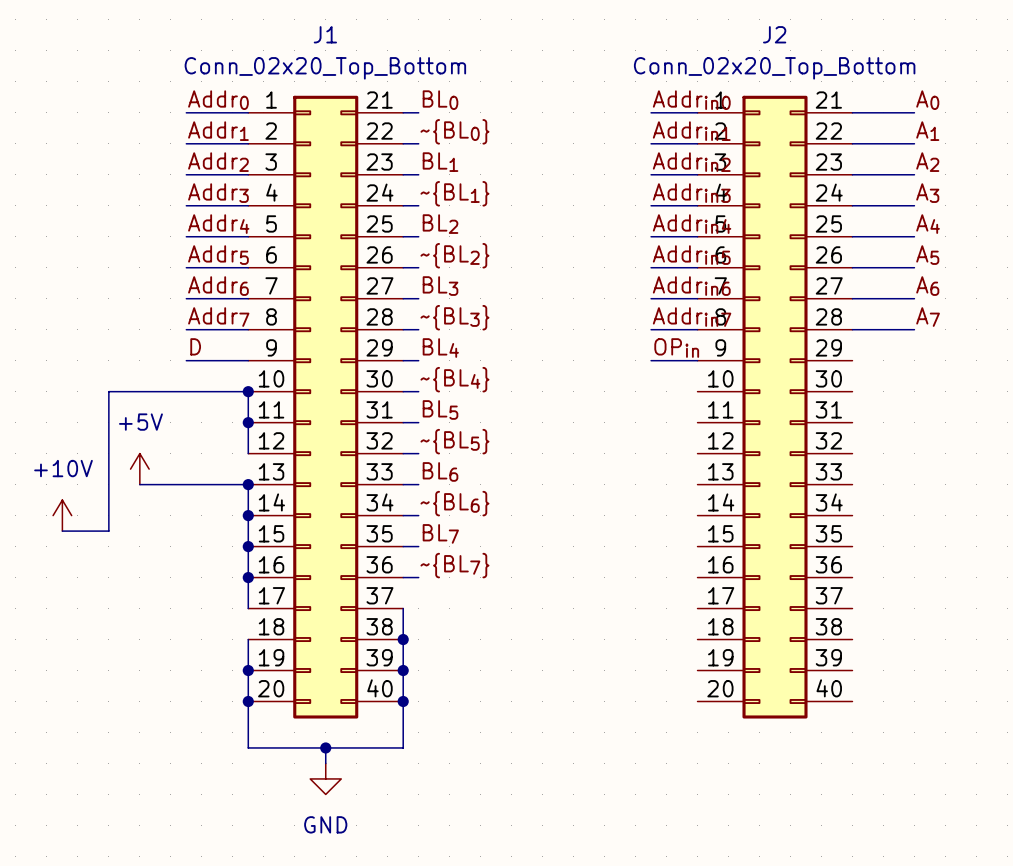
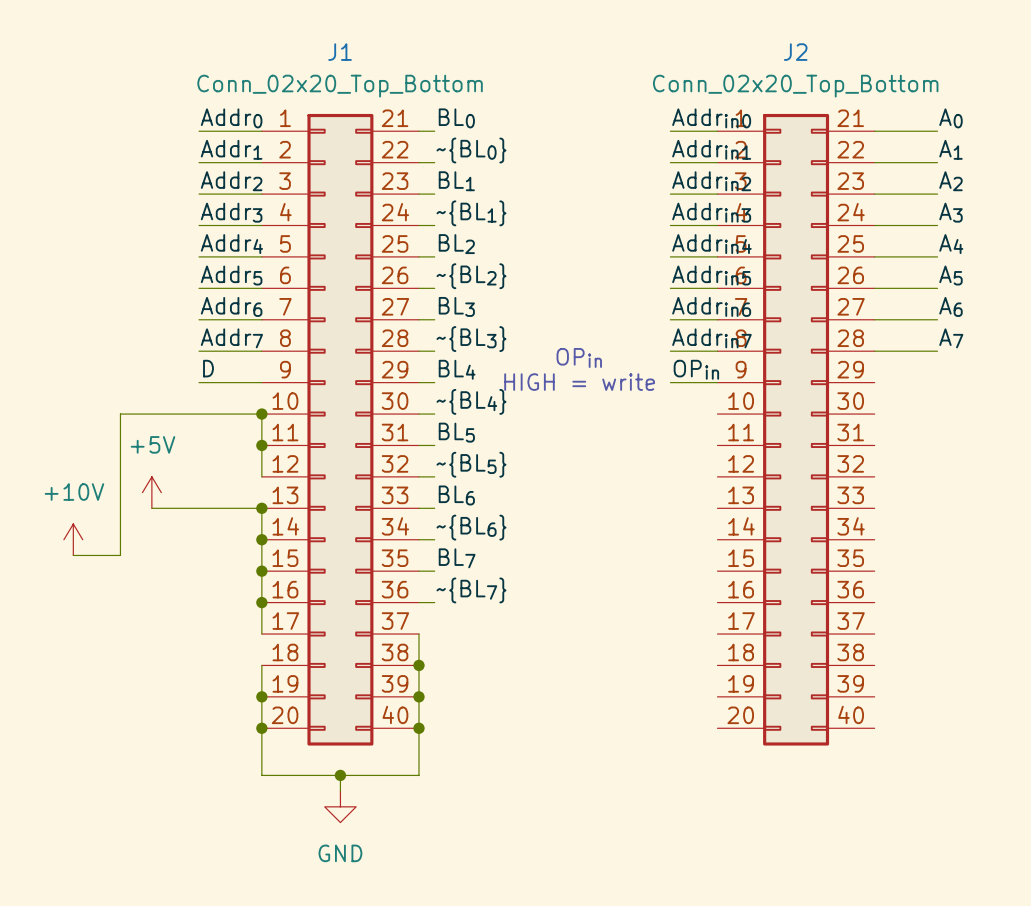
text: none -> OPin (579, 357)
text: none -> HIGH = write (579, 382)

